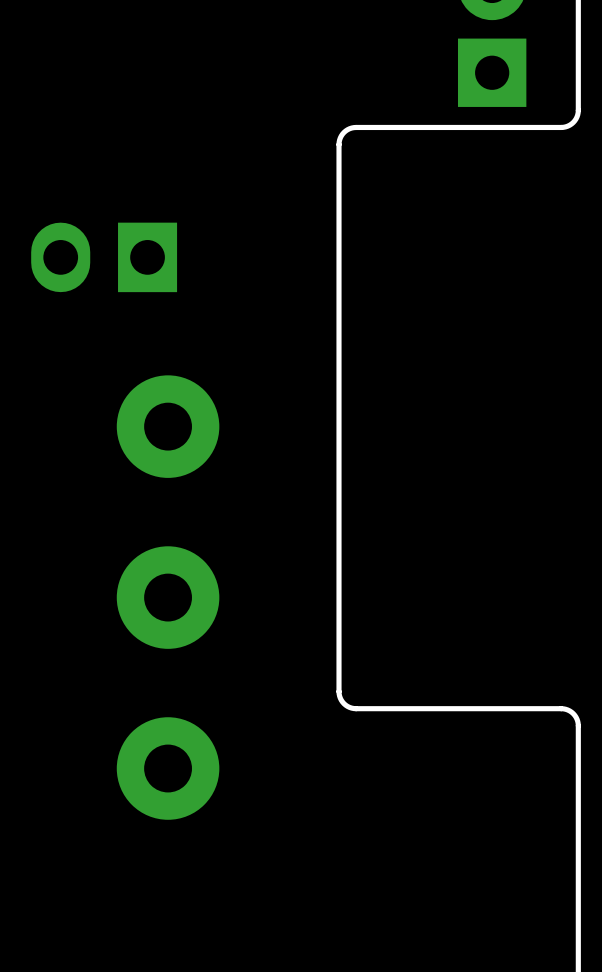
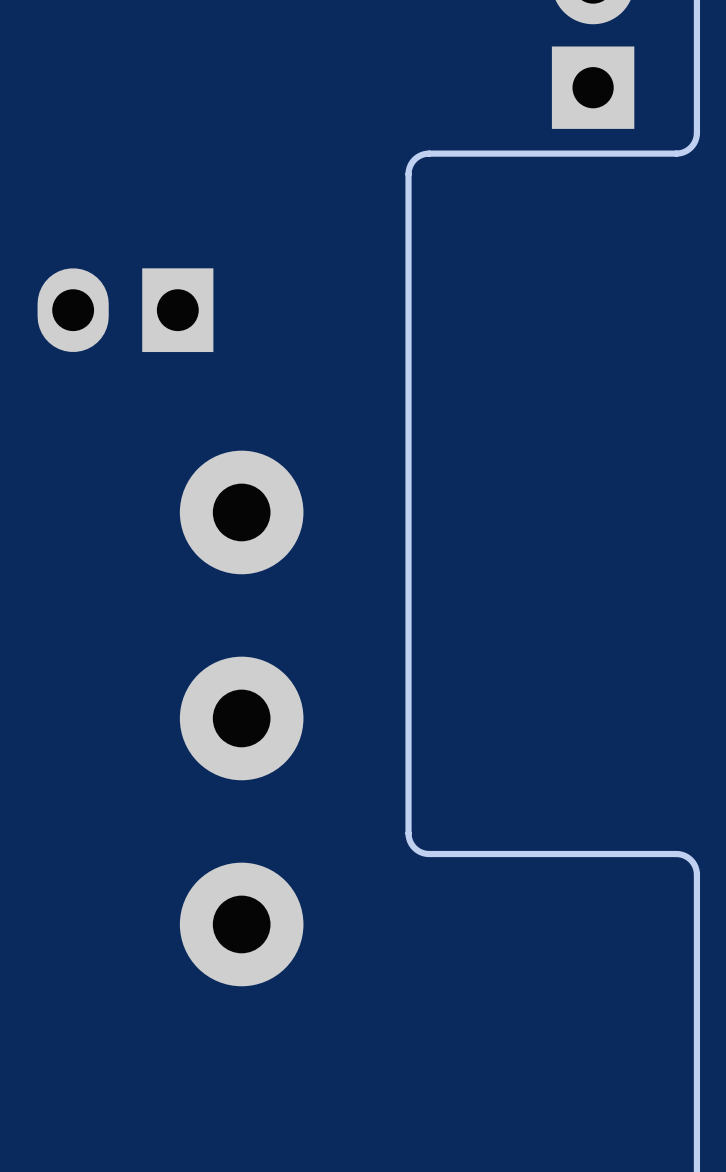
part position: (168, 597) -> (241, 718)

